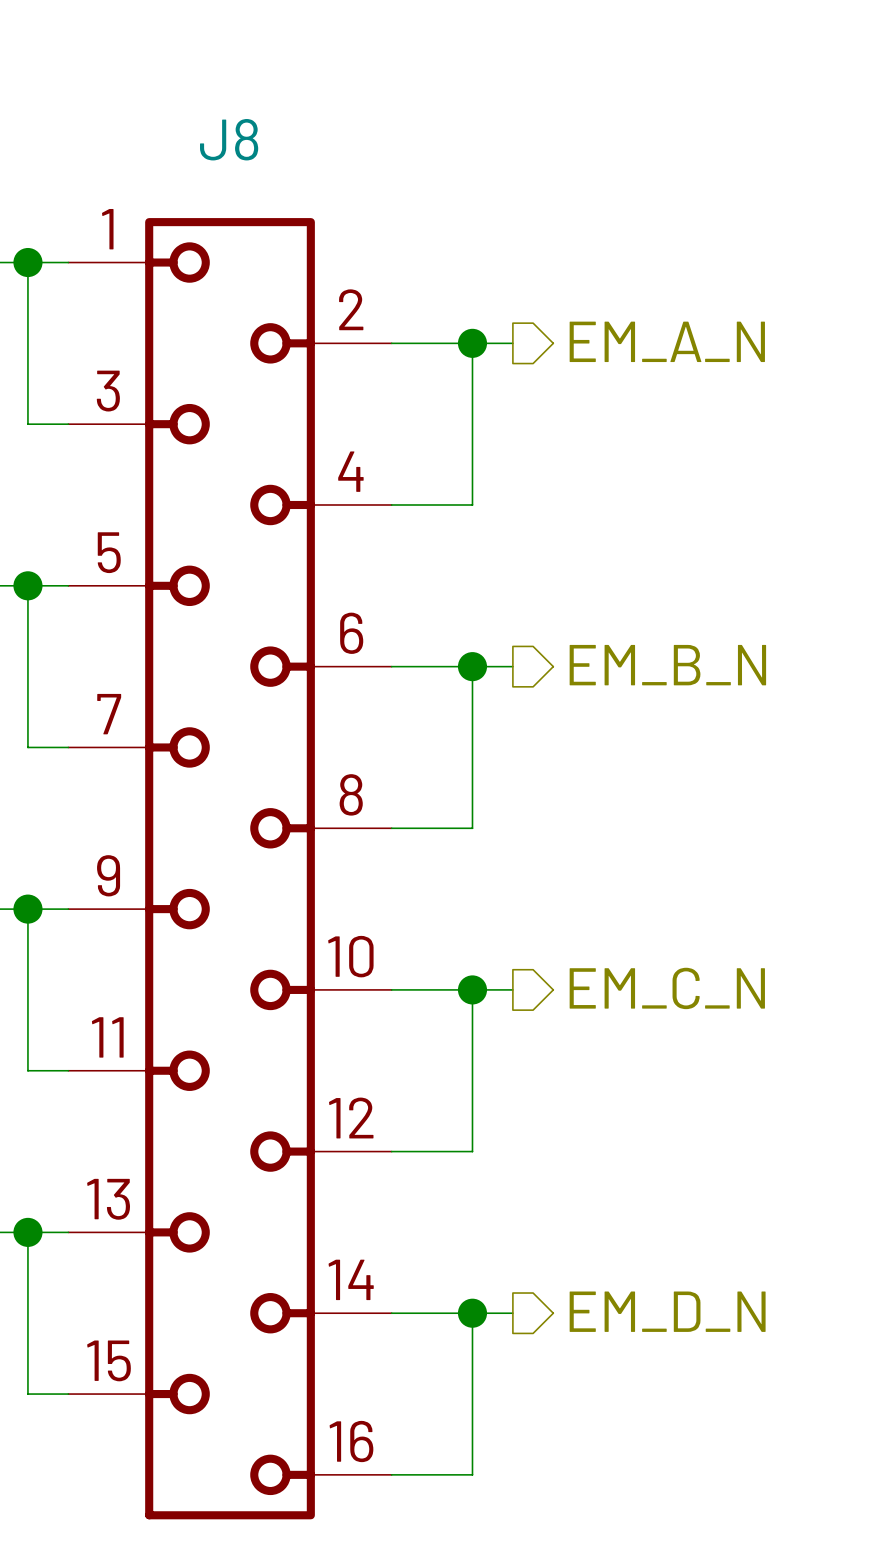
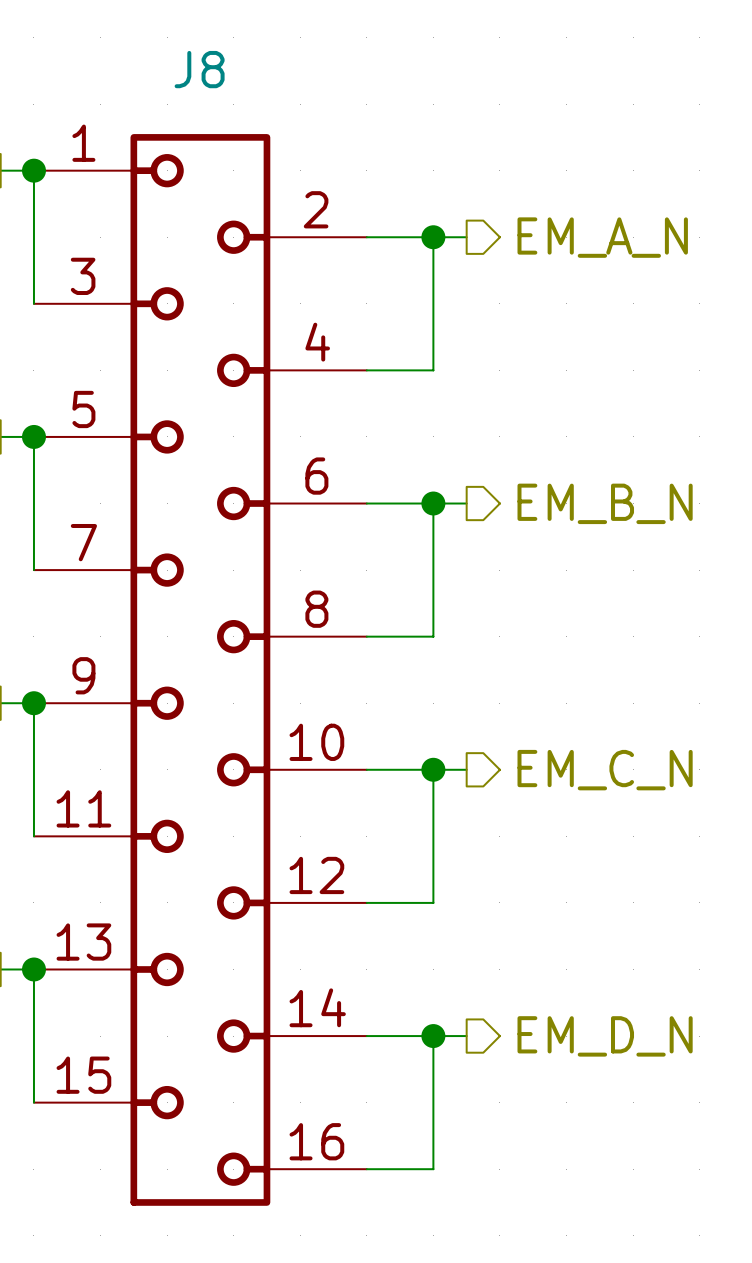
J8 symbol: [68, 218, 392, 1520] -> [33, 134, 367, 1206]
hierarchical label position: EM_A_N (667, 341) -> EM_A_N (602, 237)
wire: (472, 343) (472, 504) -> (466, 237) (433, 237) (433, 370) (400, 370)
junction position: (472, 343) -> (433, 237)
hierarchical label position: EM_B_N (667, 665) -> EM_B_N (605, 503)
wire: (472, 666) (472, 828) -> (466, 503) (433, 503) (433, 636) (400, 636)
junction position: (472, 666) -> (433, 503)
hierarchical label position: EM_C_N (667, 988) -> EM_C_N (605, 770)
wire: (472, 989) (472, 1151) -> (466, 769) (433, 769) (433, 902) (400, 902)
junction position: (472, 989) -> (433, 769)
hierarchical label position: EM_D_N (667, 1311) -> EM_D_N (605, 1036)
wire: (472, 1313) (472, 1474) -> (466, 1036) (433, 1036) (433, 1169) (400, 1169)
junction position: (472, 1313) -> (433, 1036)

